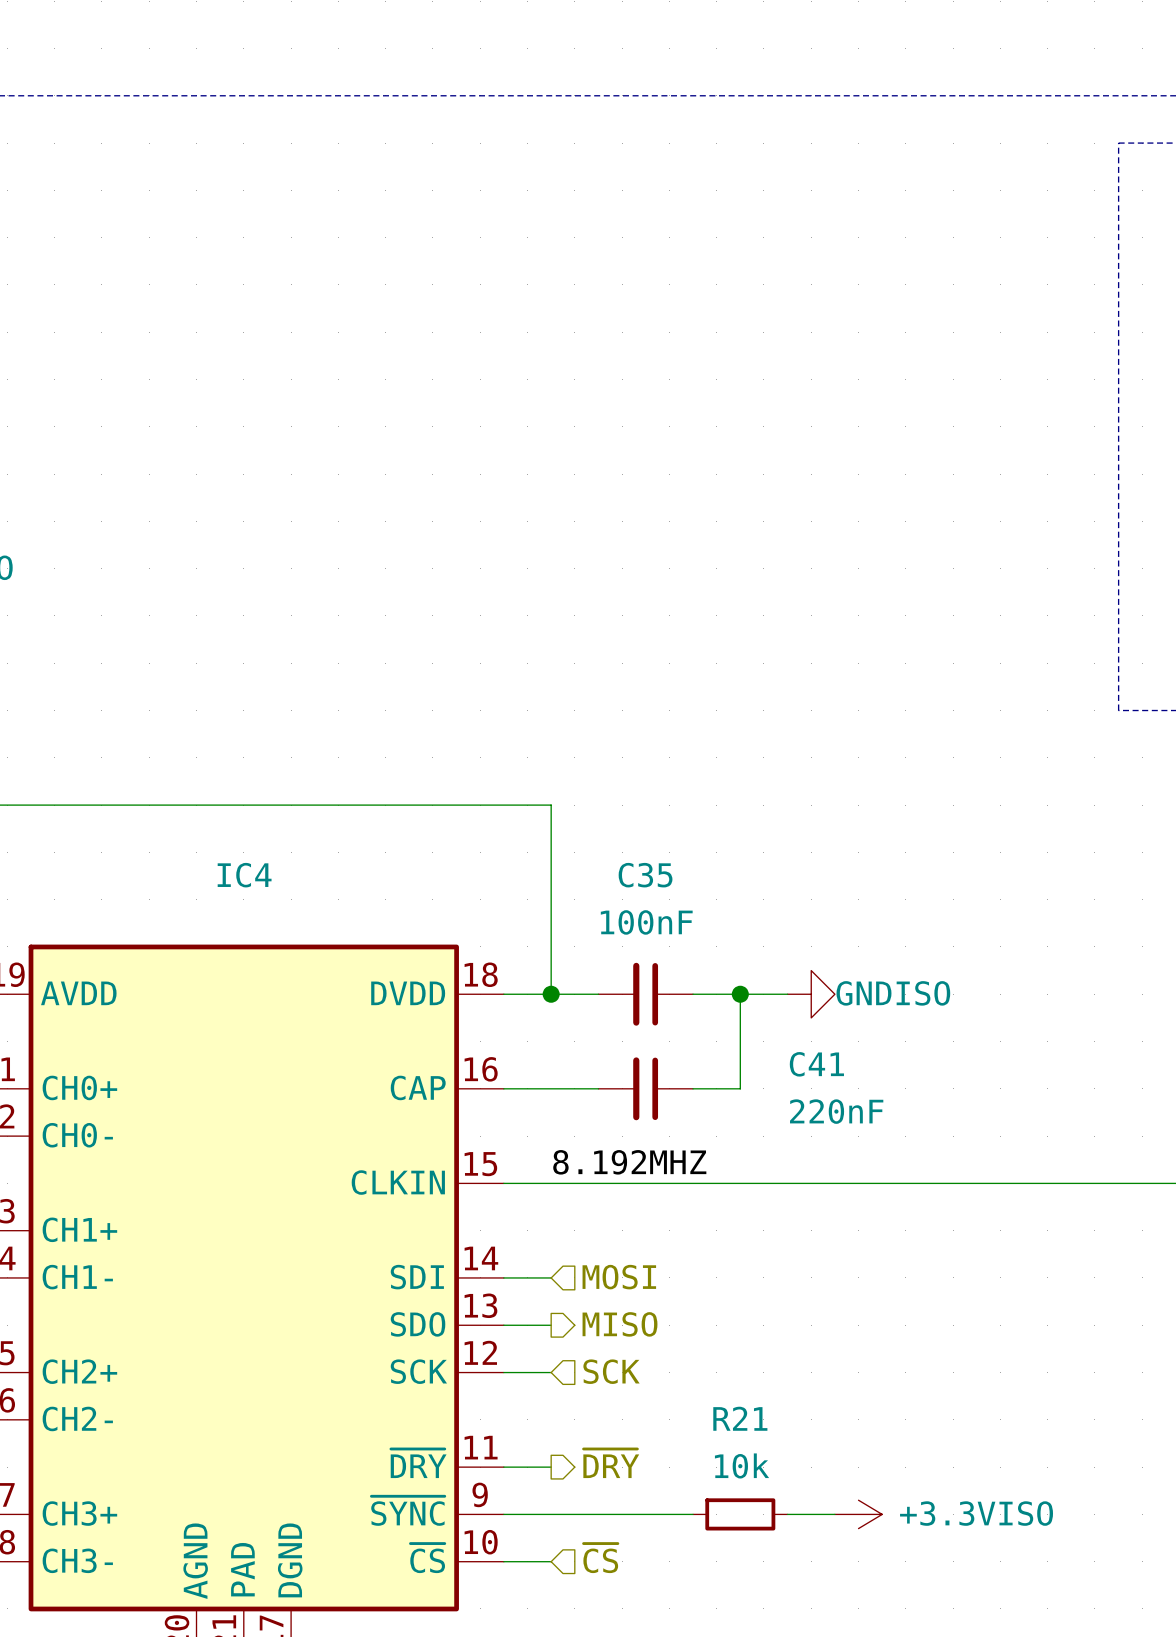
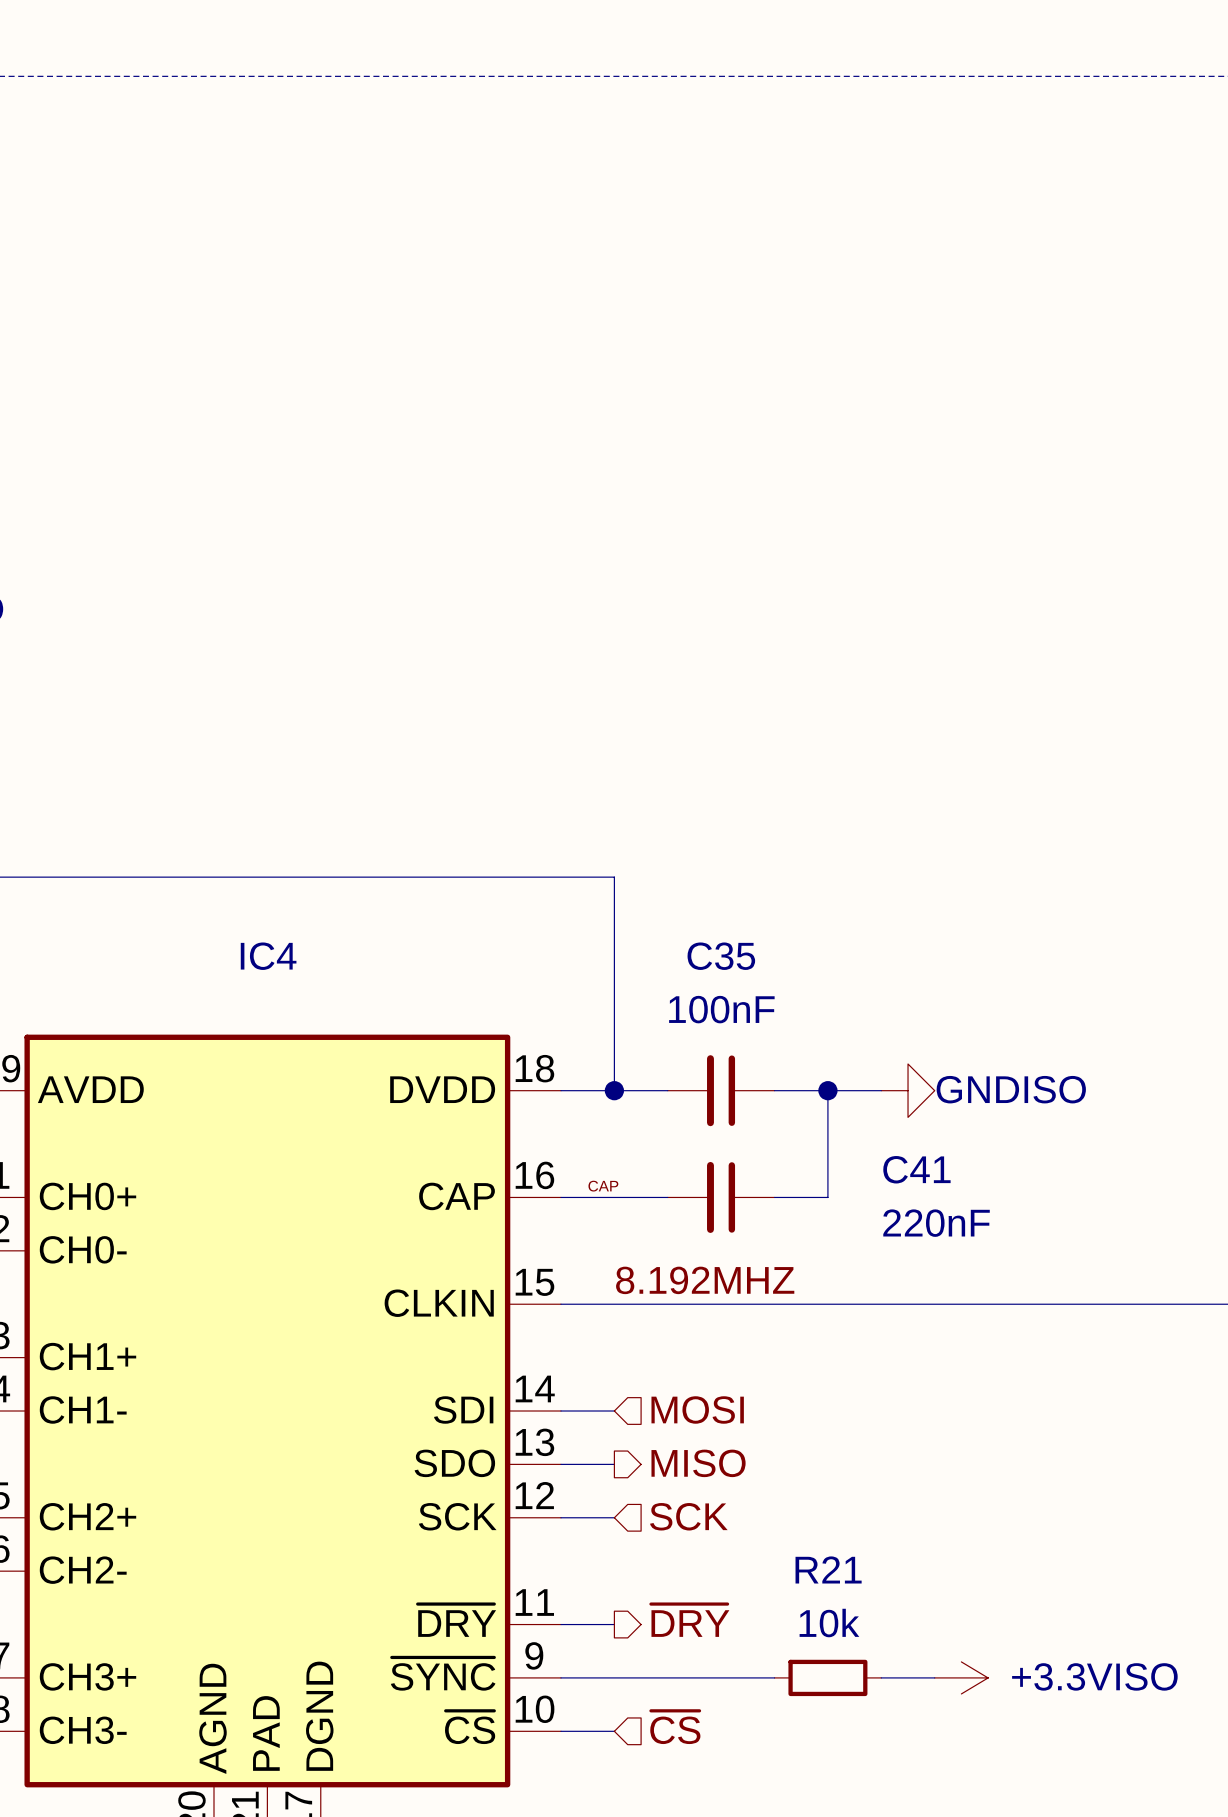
label: none -> CAP (603, 1186)

